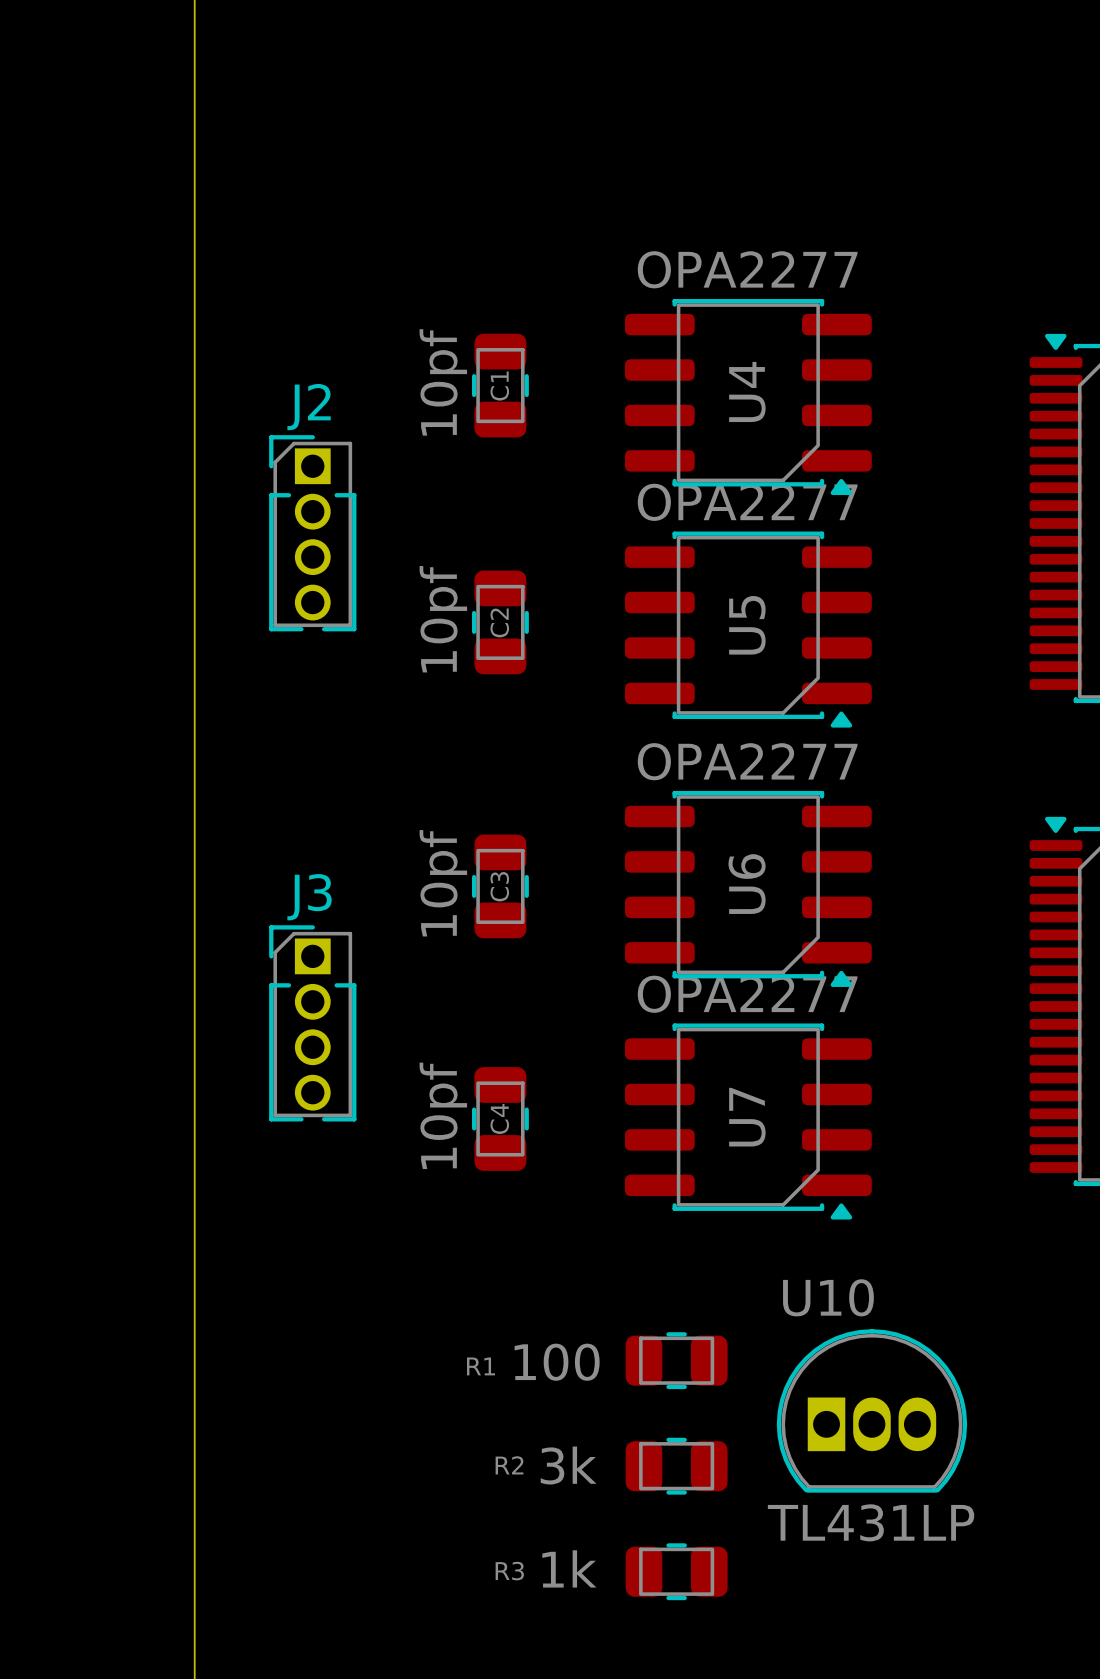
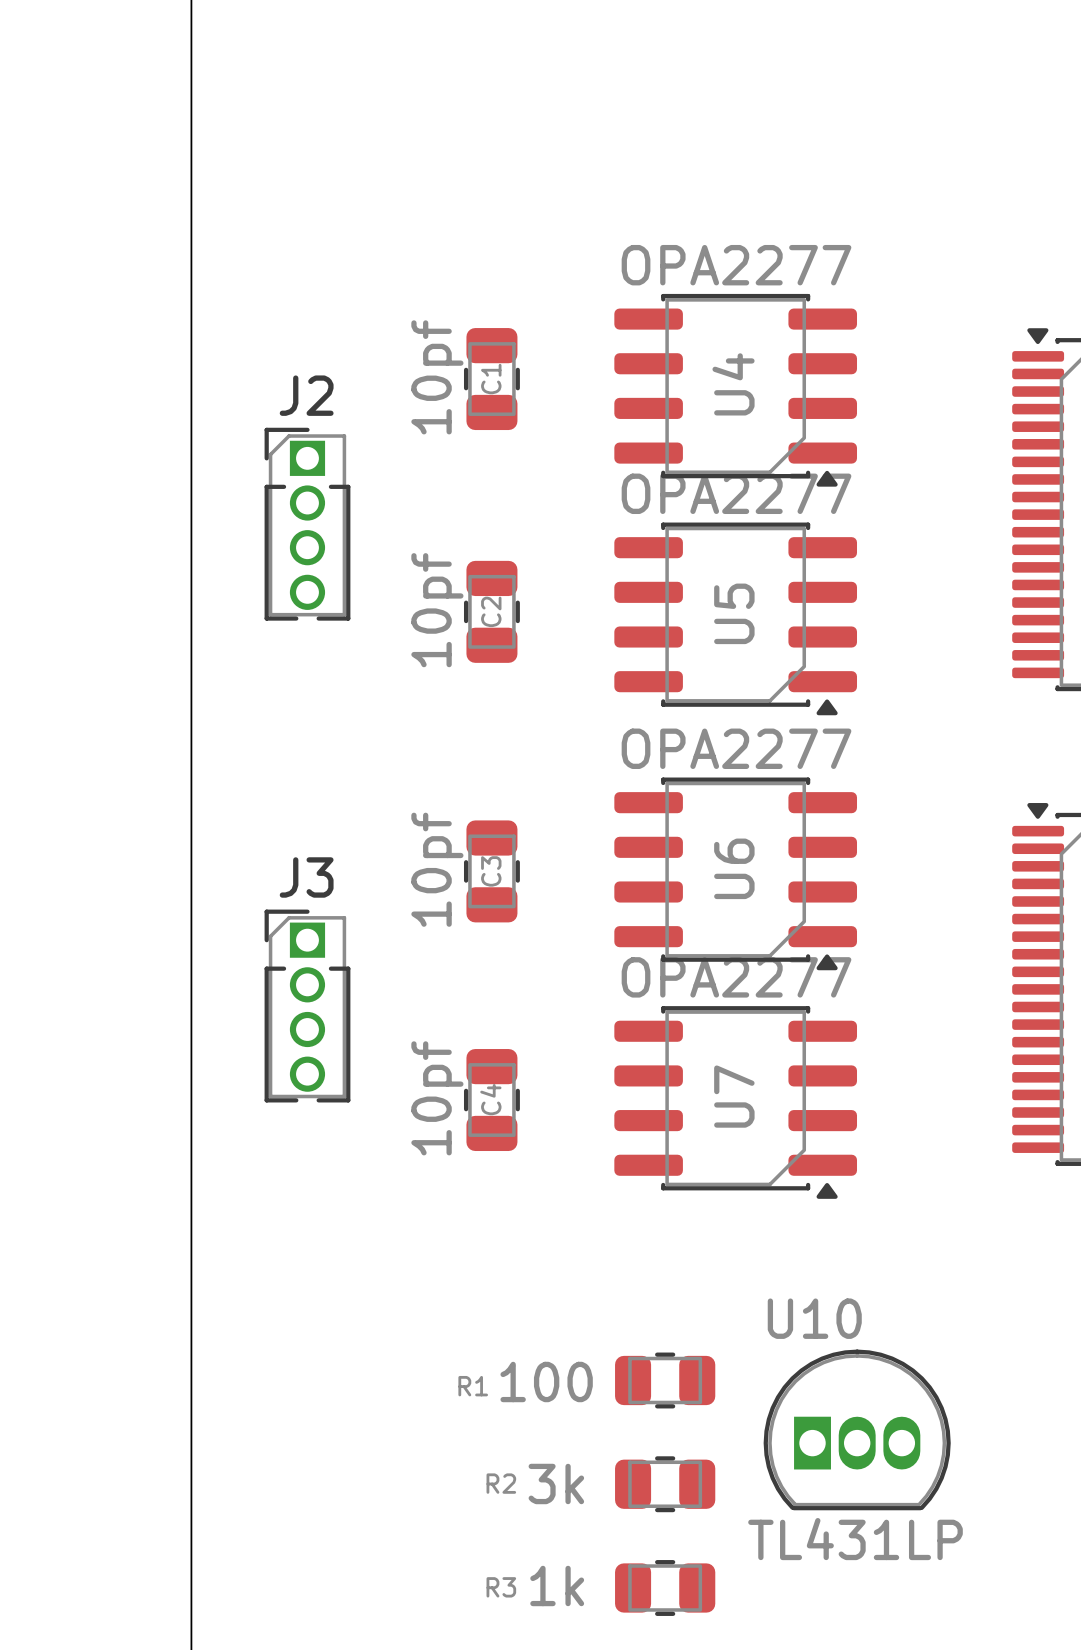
R1 position: (676, 1360) -> (665, 1380)
U10 position: (871, 1410) -> (857, 1429)
R2 position: (676, 1466) -> (665, 1484)
R3 position: (676, 1571) -> (665, 1588)

